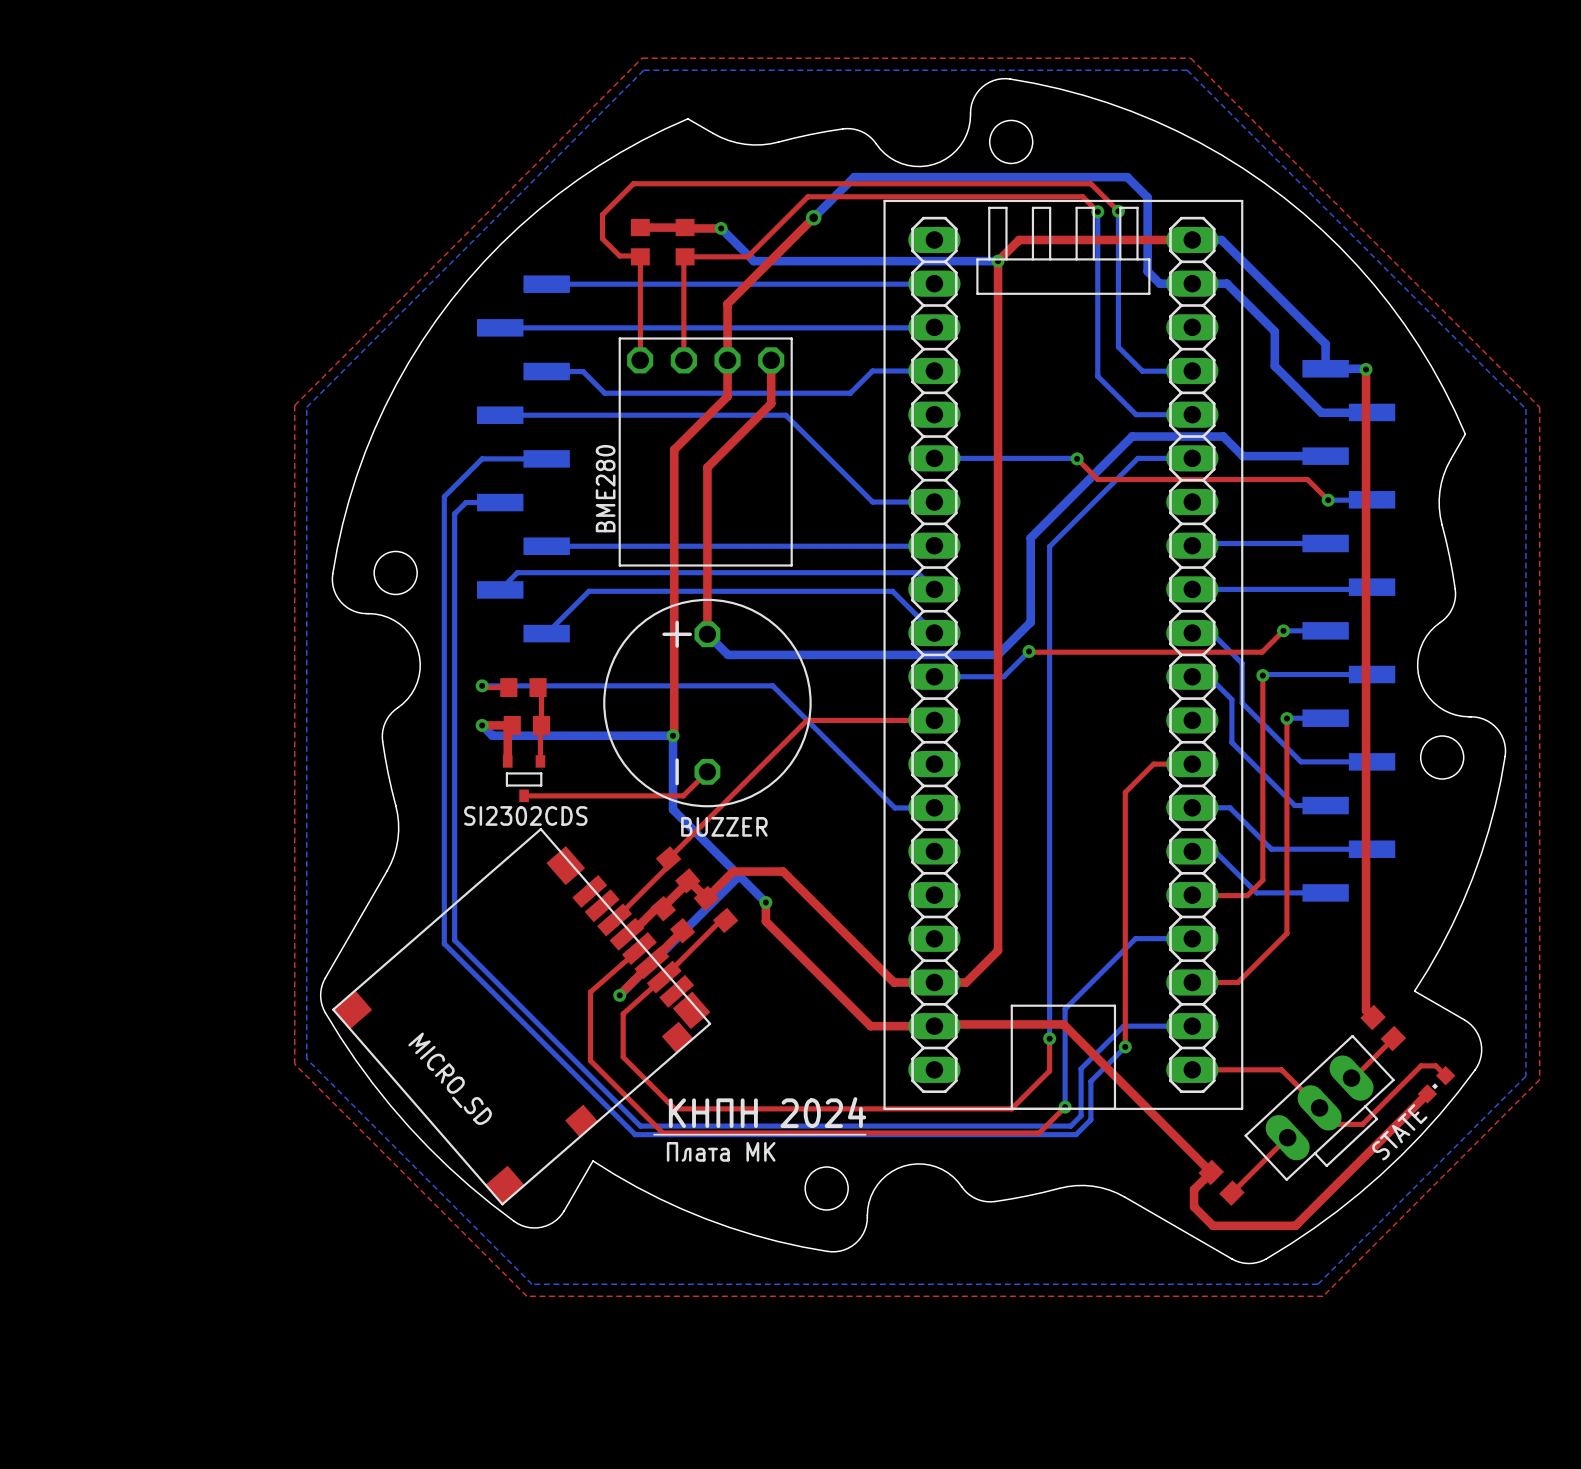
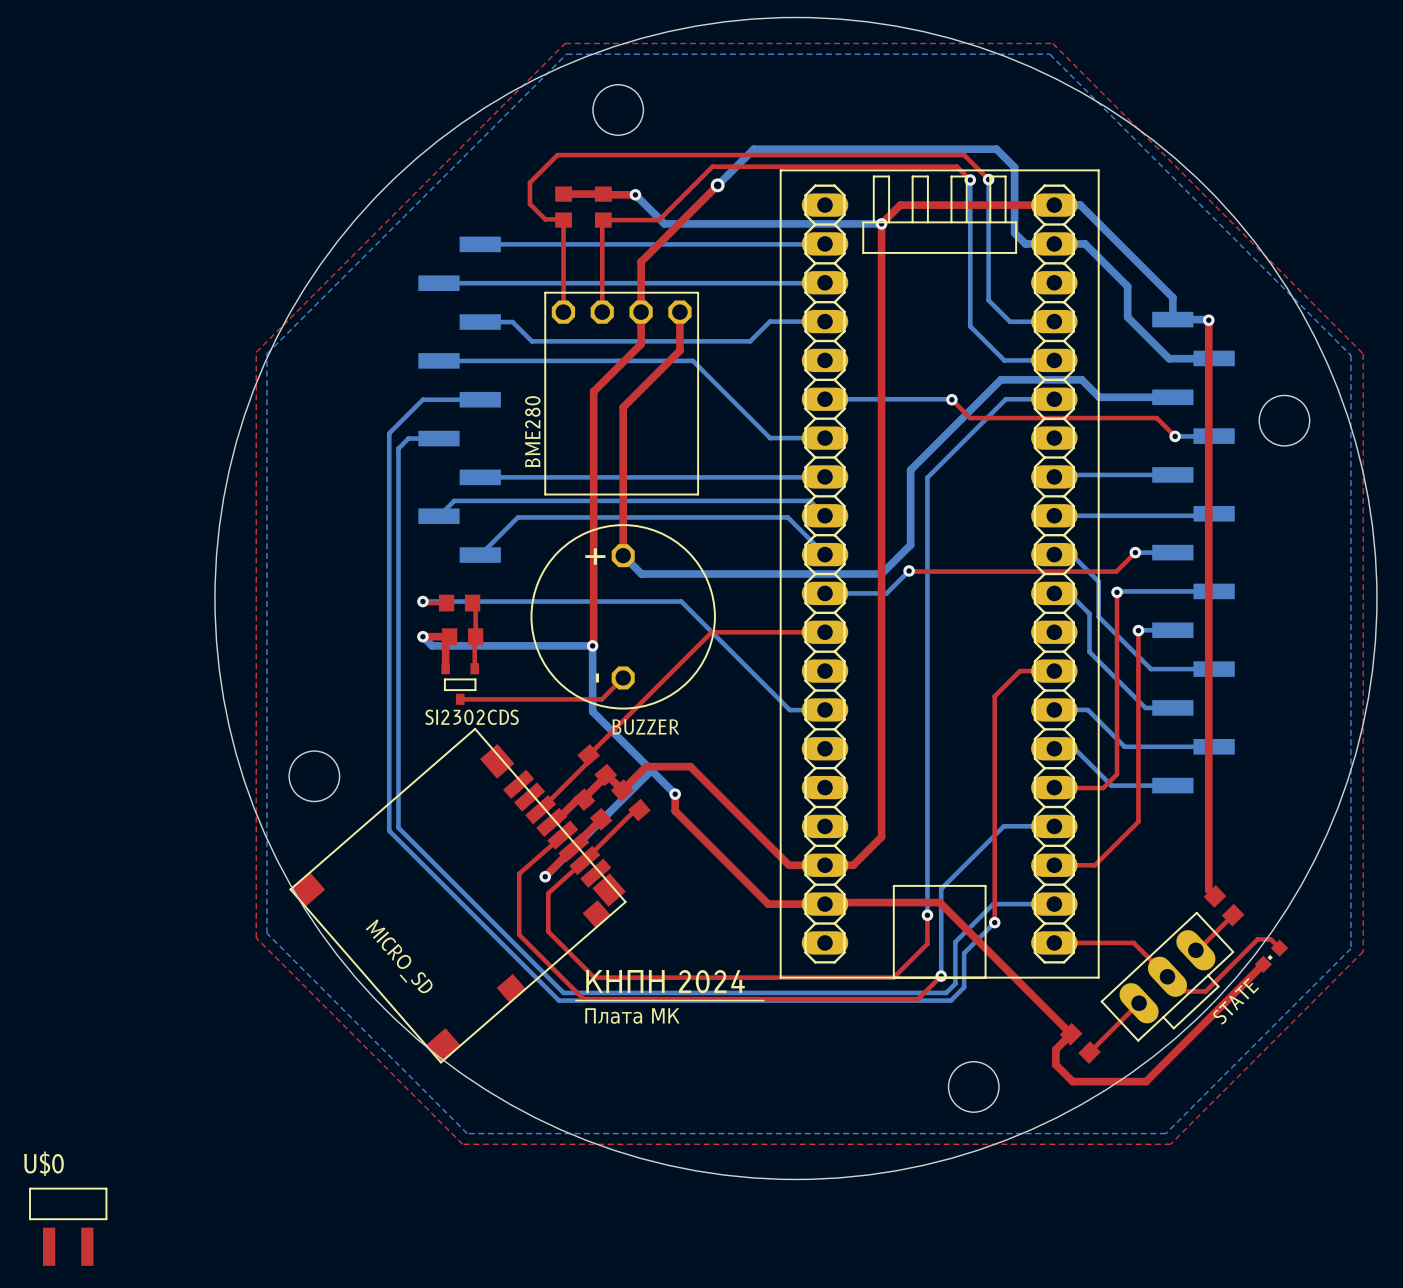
drawing: none -> [214, 17, 1378, 1180]
board edge: (1010, 79) (1083, 95) (1154, 120) (1221, 155) (1283, 197) (1322, 230) (1374, 284) (1418, 345) (1455, 411) (1465, 434) (1446, 467) (1441, 483) (1439, 499) (1440, 516) (1449, 556) (1455, 596) (1448, 614) (1430, 631) (1423, 641) (1417, 660) (1418, 673) (1425, 692) (1438, 706) (1456, 715) (1483, 719) (1494, 725) (1501, 735) (1505, 752) (1495, 806) (1472, 878) (1440, 947) (1414, 991) (1464, 1019) (1473, 1027) (1481, 1046) (1479, 1062) (1439, 1114) (1380, 1175) (1314, 1228) (1266, 1258) (1256, 1262) (1245, 1263) (1235, 1260) (1109, 1190) (1092, 1186) (1075, 1185) (1011, 1198) (987, 1201) (969, 1195) (953, 1176) (942, 1169) (923, 1164) (910, 1164) (897, 1168) (881, 1179) (871, 1196) (866, 1225) (861, 1237) (851, 1246) (836, 1251) (777, 1241) (705, 1218) (636, 1186) (593, 1160) (564, 1210) (556, 1220) (537, 1227) (521, 1225) (469, 1186) (409, 1126) (355, 1060) (325, 1012) (321, 1002) (320, 991) (323, 981) (394, 855) (397, 839) (398, 822) (385, 757) (382, 733) (389, 715) (407, 699) (414, 688) (420, 669) (419, 656) (415, 644) (404, 628) (387, 617) (350, 609) (338, 598) (333, 586) (332, 573) (342, 524) (356, 476) (374, 429) (396, 384) (422, 341) (451, 300) (483, 262) (519, 226) (557, 194) (599, 165) (642, 140) (687, 118) (720, 137) (736, 142) (753, 144) (770, 143) (810, 134) (850, 128) (868, 135) (884, 153) (895, 161) (914, 166) (927, 165) (945, 158) (960, 145) (968, 127) (972, 100) (979, 89) (993, 80) (1010, 79) -> none
round board edge: [989, 120, 1033, 164] -> none
round board edge: [374, 551, 418, 595] -> none
round board edge: [1420, 735, 1464, 780] -> none
round board edge: [805, 1166, 849, 1211] -> none
U$0: none -> (68, 1226)

